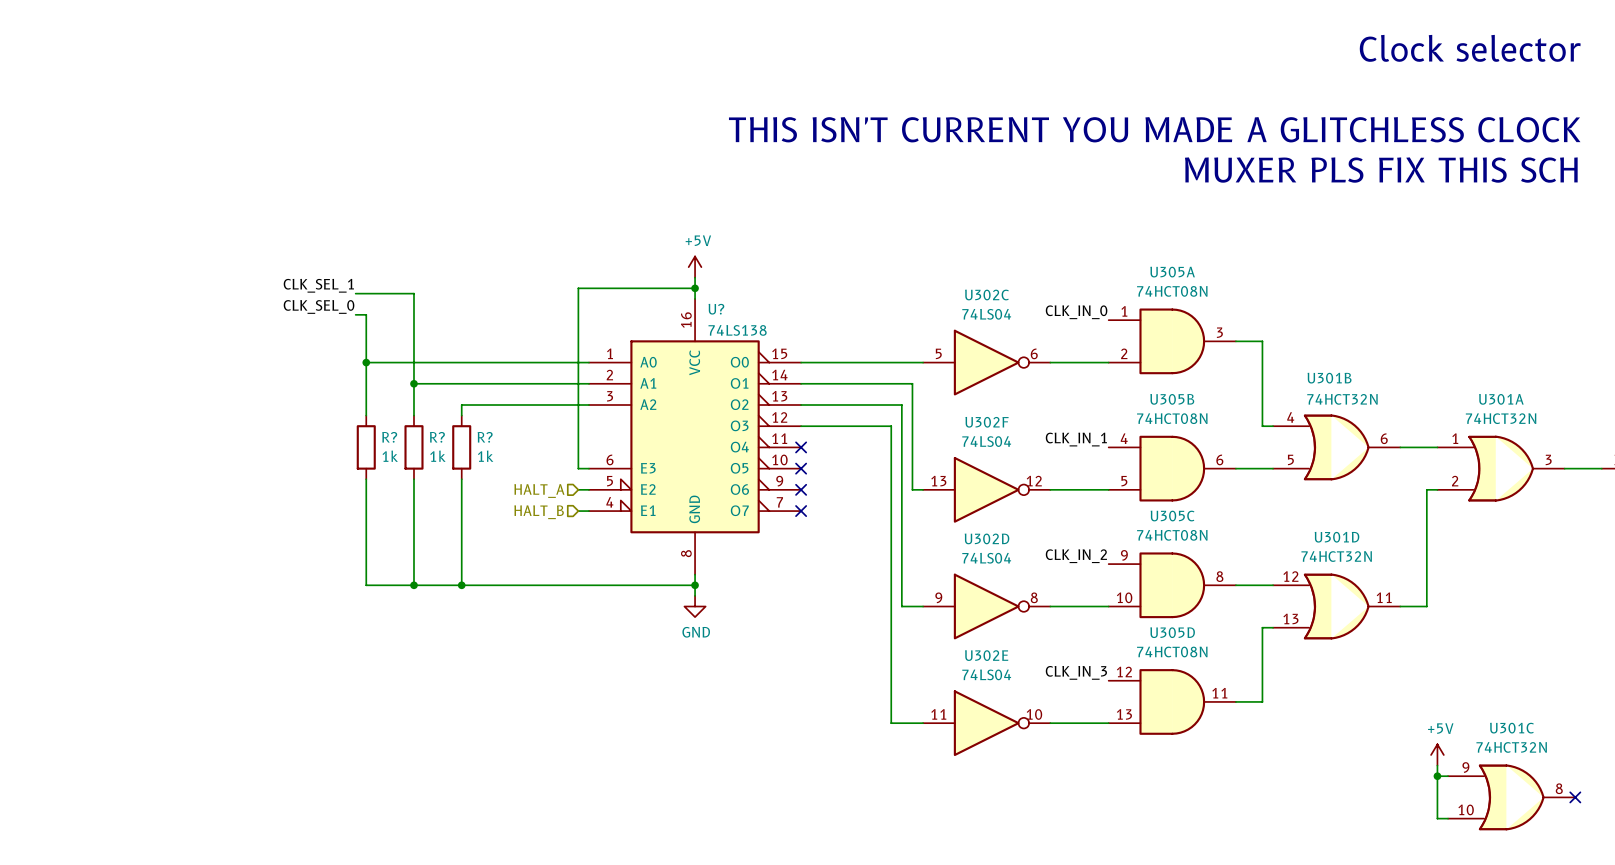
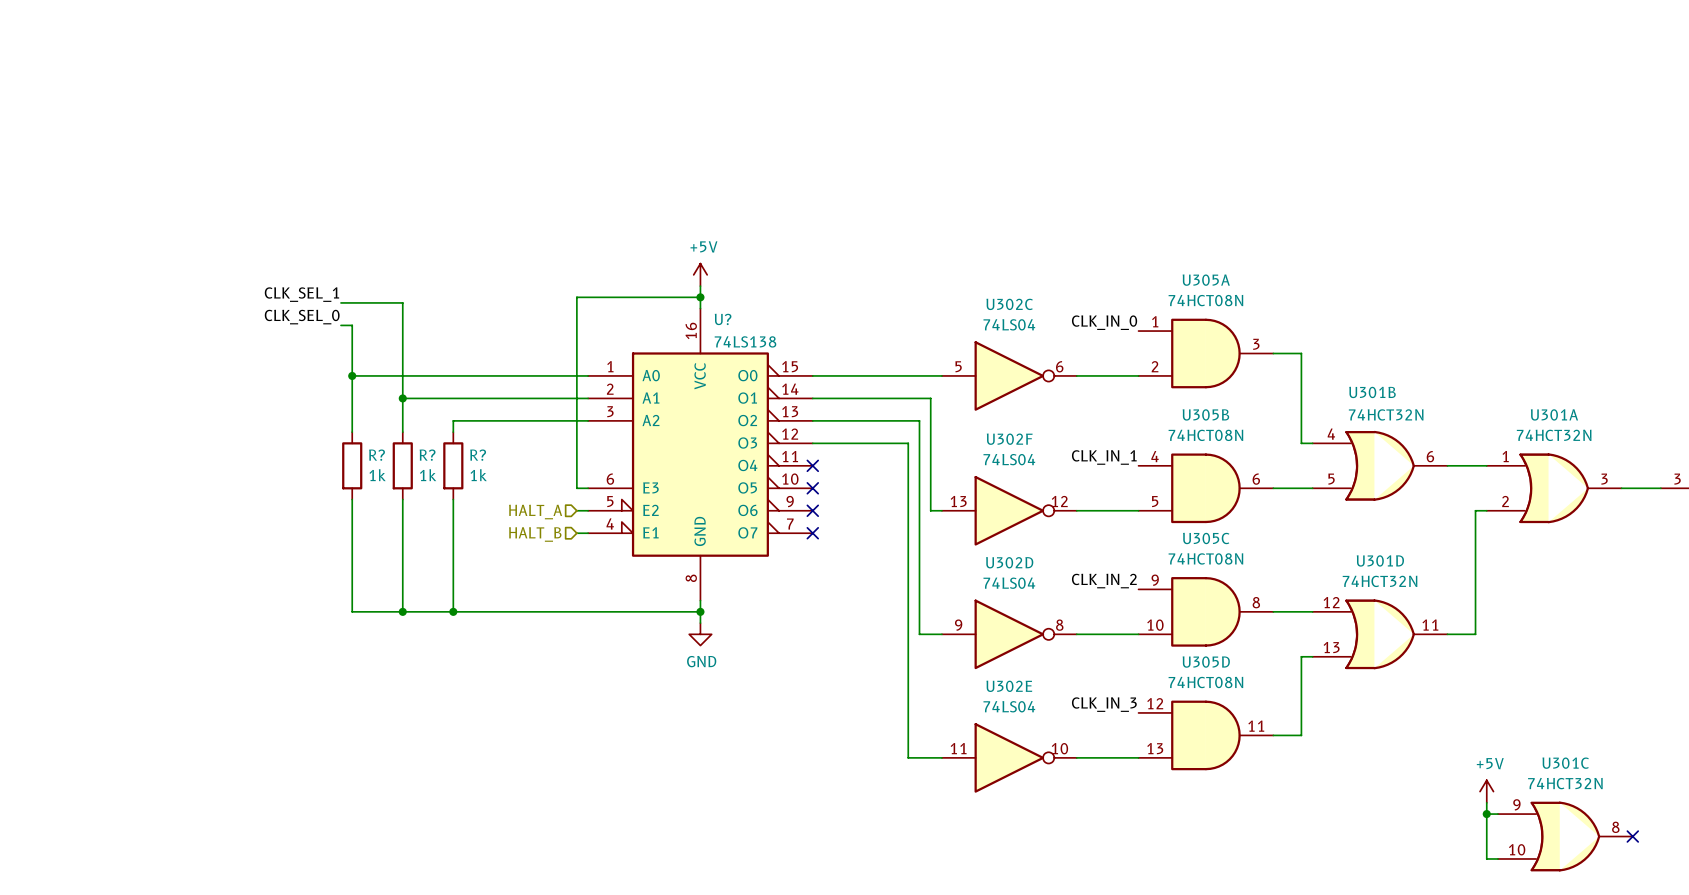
text: Clock selector (1470, 48) -> none
text: THIS ISN'T CURRENT YOU MADE A GLITCHLESS CLOCK (1154, 129) -> none
text: MUXER PLS FIX THIS SCH (1381, 170) -> none

